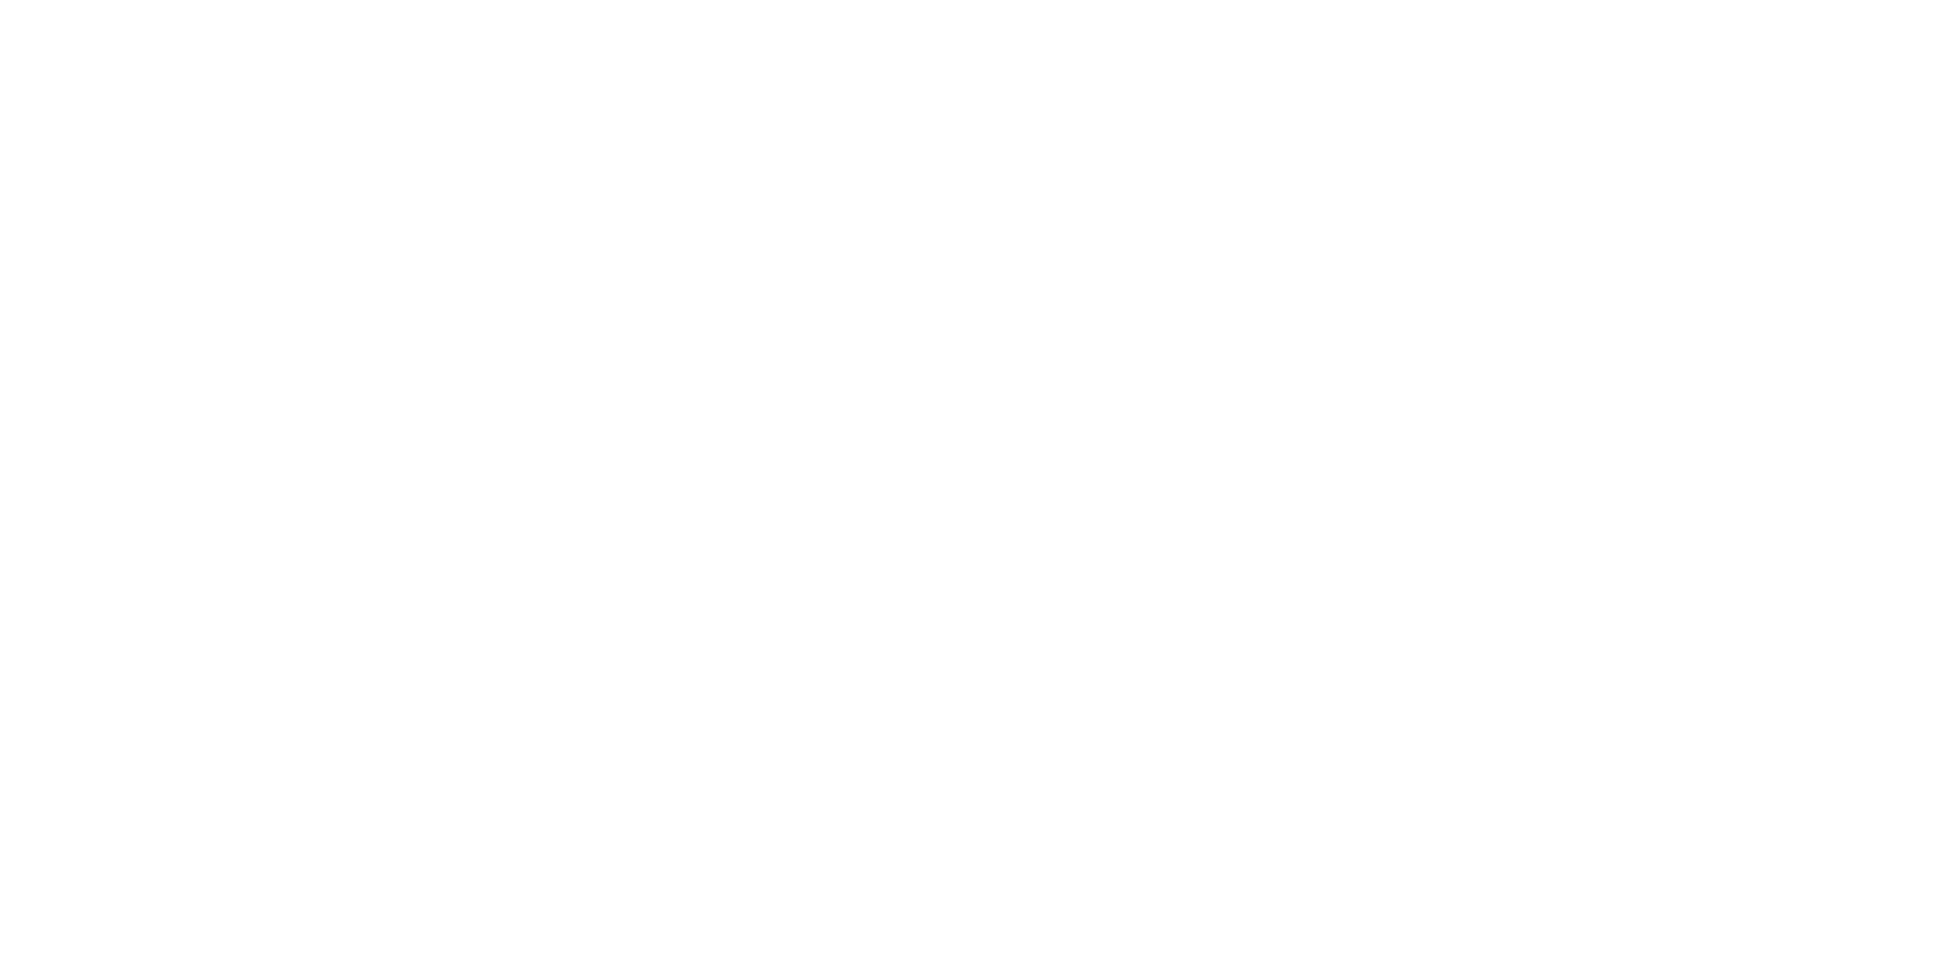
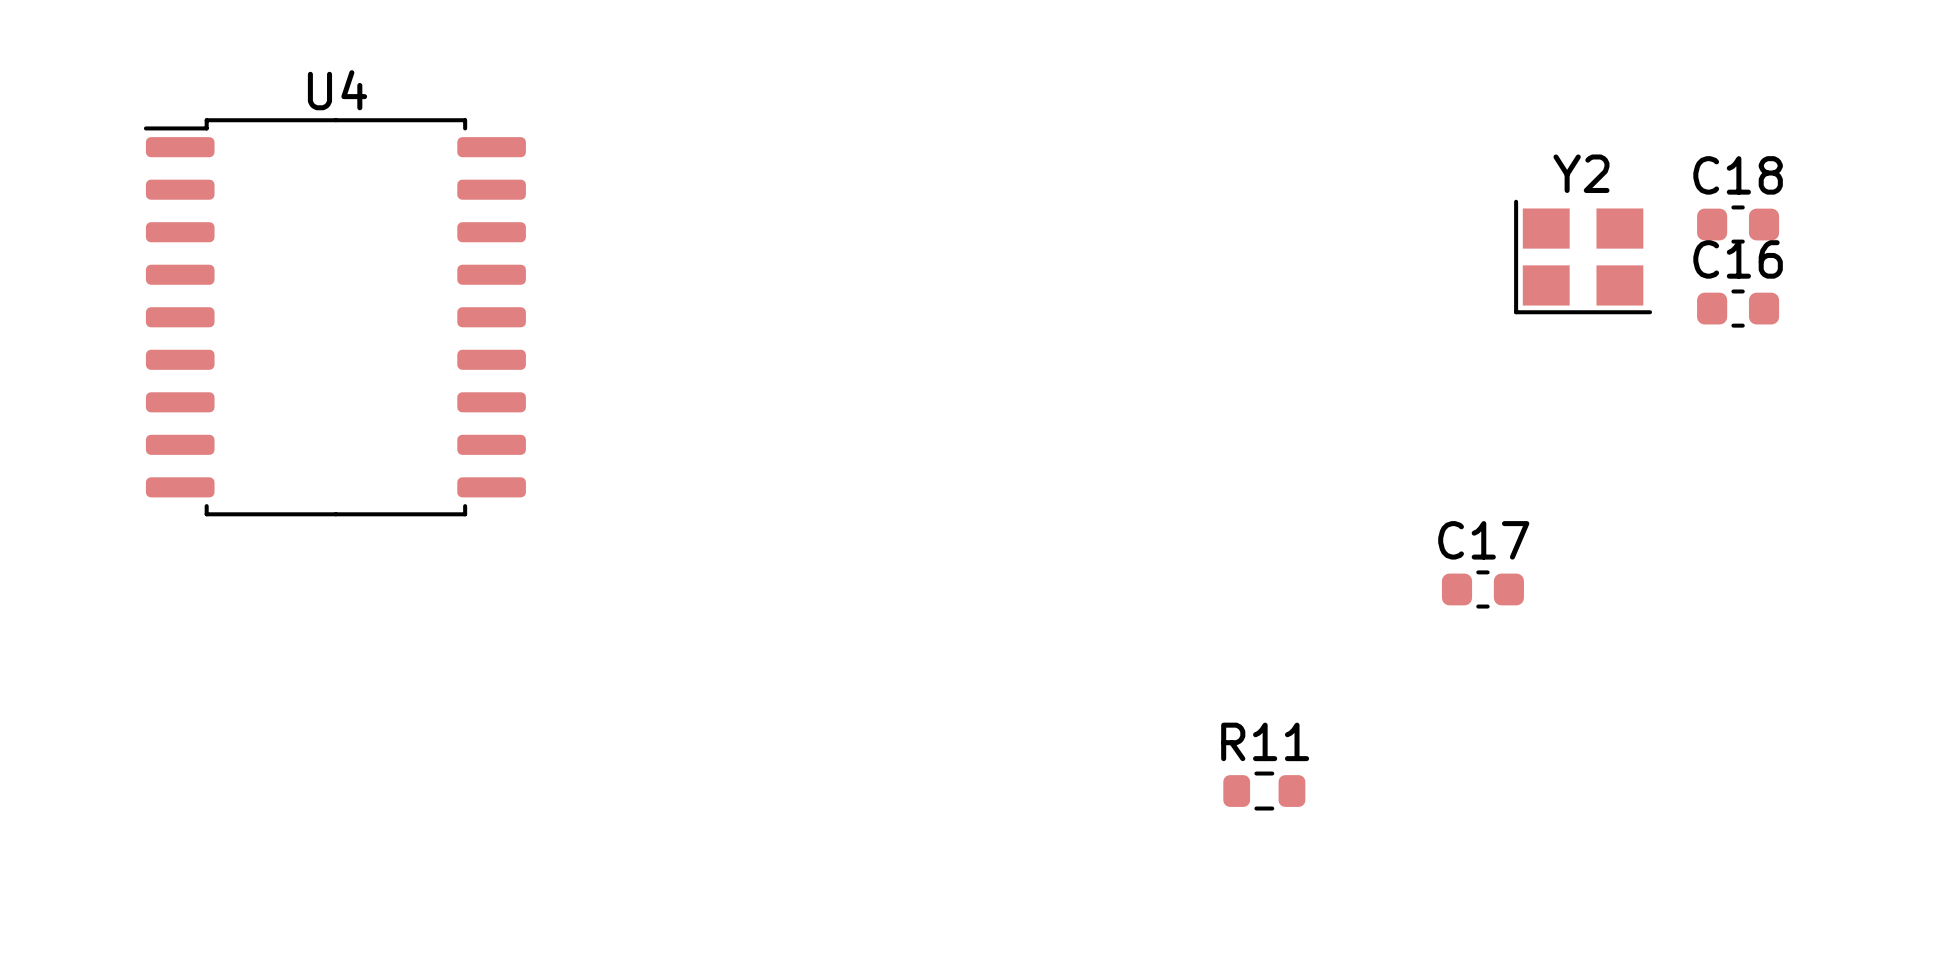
C18: none -> (1738, 224)
Y2: none -> (1583, 257)
C16: none -> (1738, 308)
U4: none -> (334, 317)
C17: none -> (1482, 589)
R11: none -> (1264, 791)

